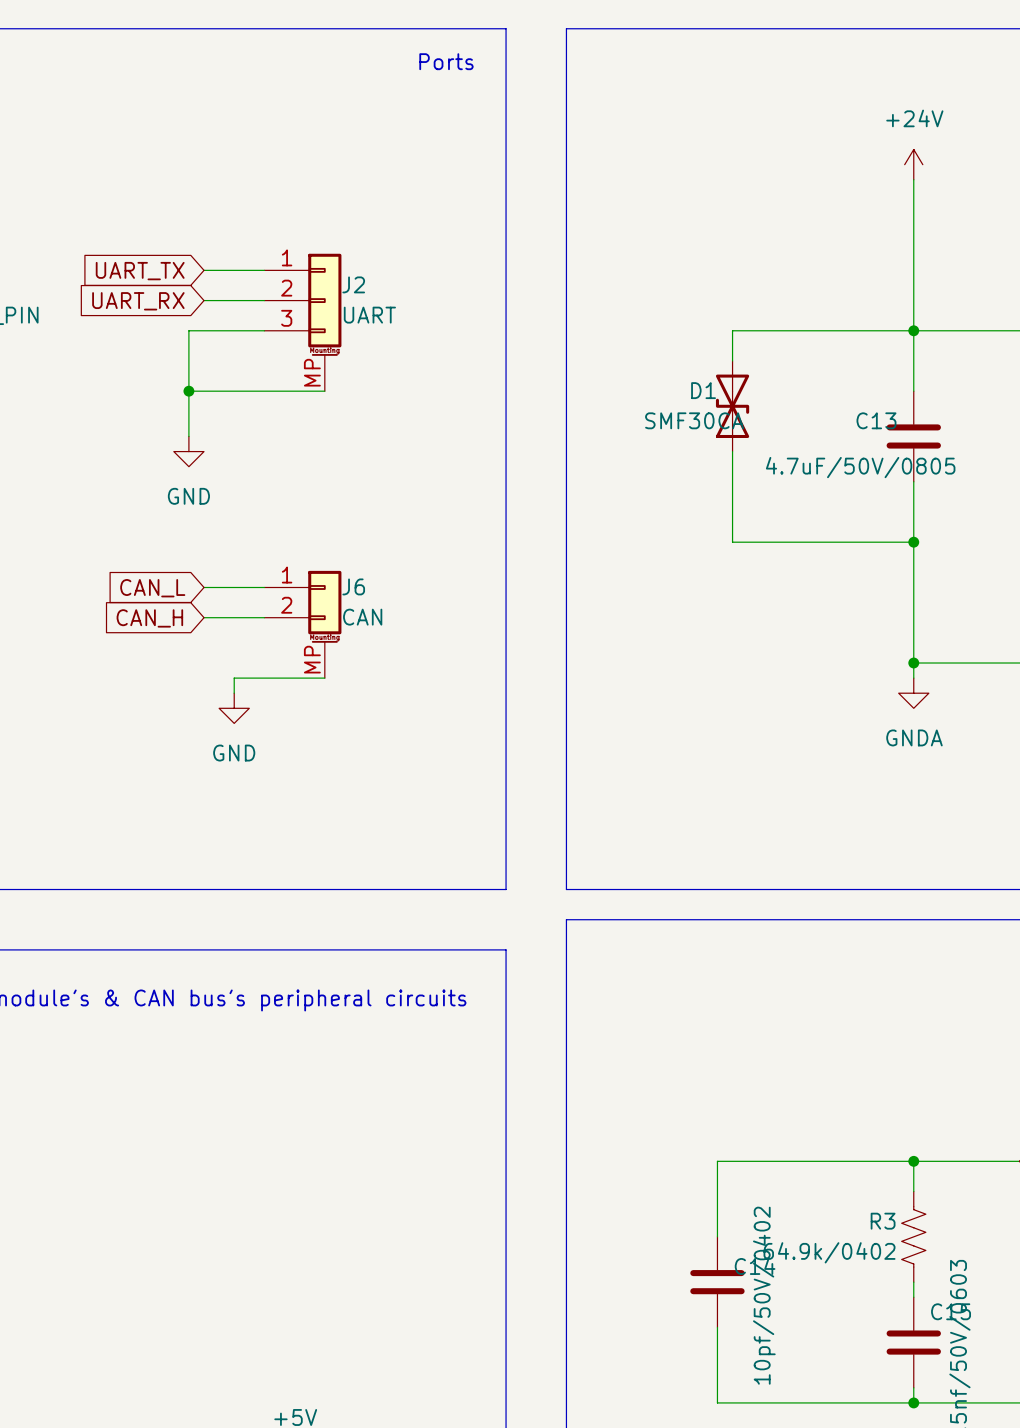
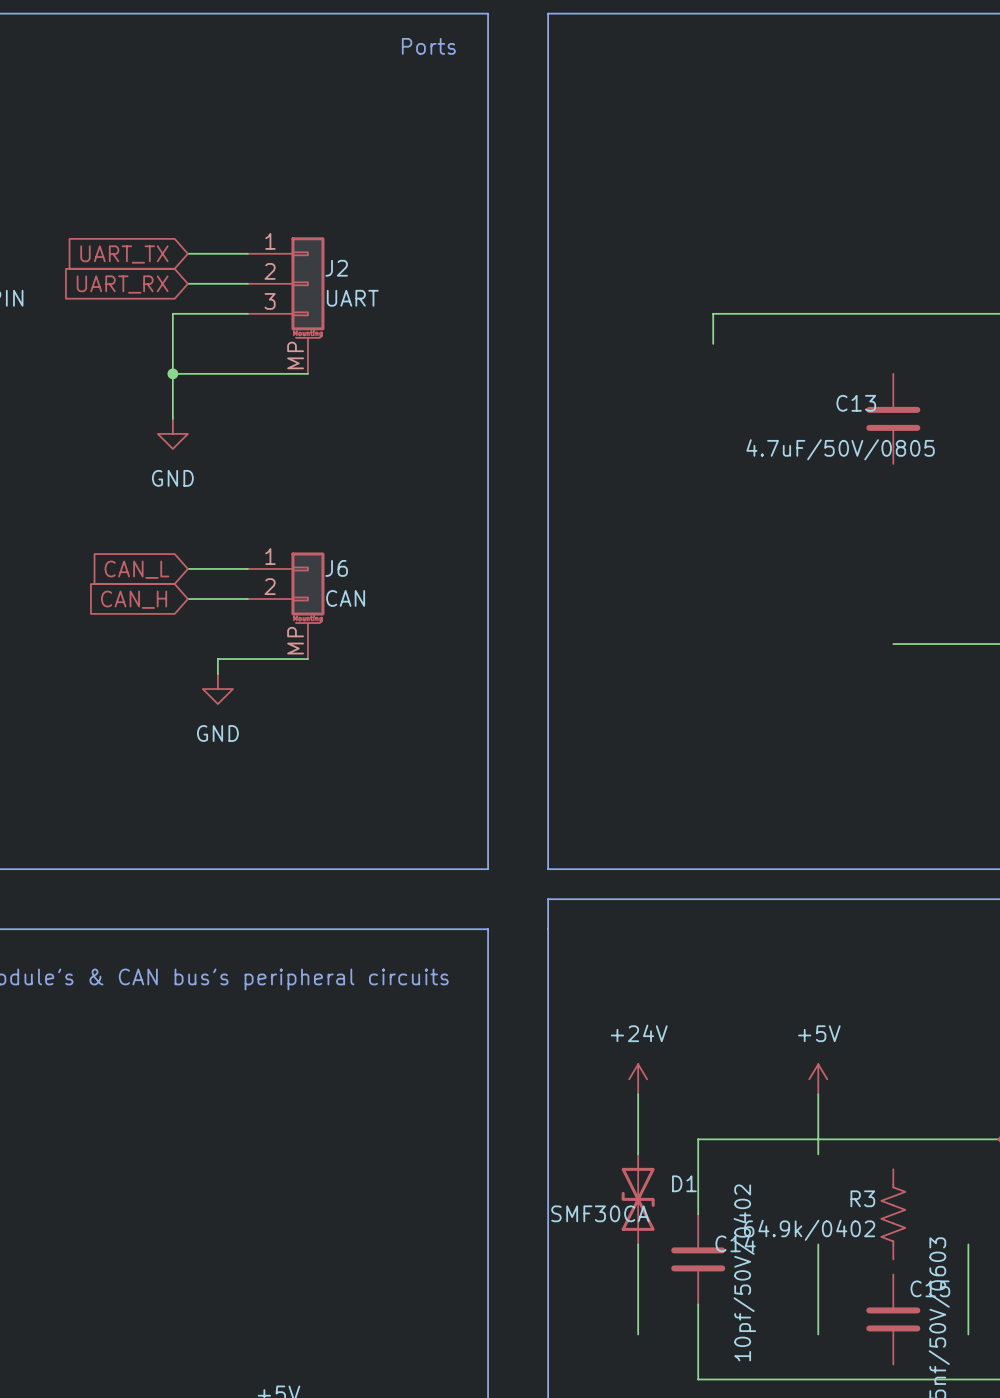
power symbol: +24V (913, 164) -> none
wire: (913, 179) (913, 391) -> none
junction: (913, 330) -> none
D1 name position: D1 (703, 390) -> D1 (684, 1183)
D1 position: (732, 406) -> (638, 1199)
wire: (732, 451) (732, 542) (913, 542) -> none
wire: (913, 481) (913, 678) -> none
junction: (913, 542) -> none
junction: (913, 663) -> none
power symbol: GNDA (913, 693) -> none
power symbol: none -> +24V (638, 1079)
power symbol: none -> +5V (818, 1079)
wire: none -> (638, 1094) (638, 1154)
wire: none -> (818, 1094) (818, 1154)
wire: (913, 1161) (913, 1191) -> none
junction: (913, 1161) -> none
wire: none -> (638, 1244) (638, 1334)
wire: none -> (818, 1244) (818, 1334)
wire: none -> (968, 1244) (968, 1334)
wire: (913, 1282) (913, 1297) -> none
wire: (913, 1387) (913, 1402) -> none
junction: (913, 1402) -> none

